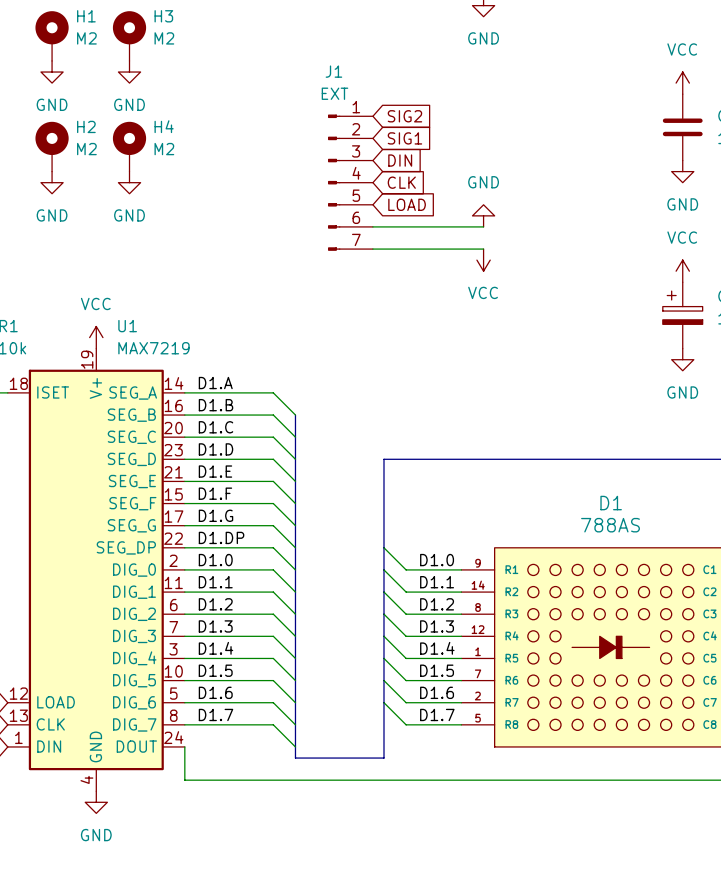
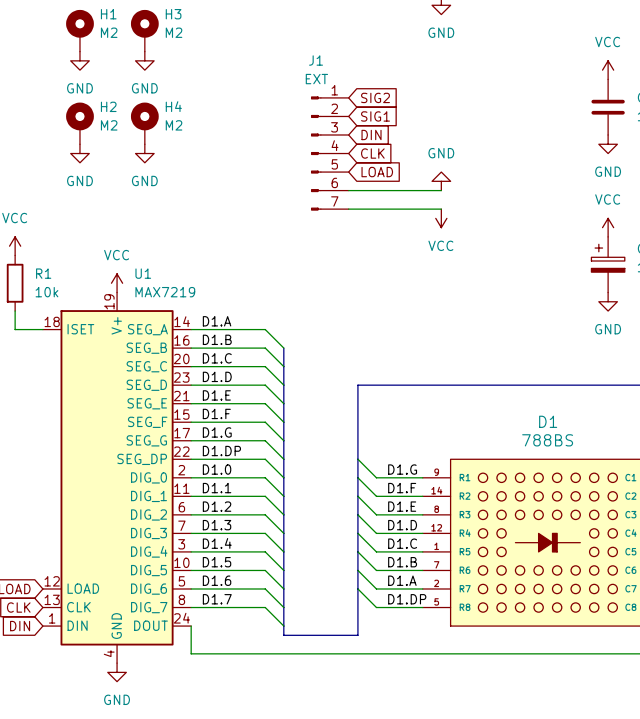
D1 value: 788AS (610, 525) -> 788BS (547, 440)
label: D1.0 (437, 560) -> D1.G (402, 469)
label: D1.1 (437, 582) -> D1.F (402, 488)
label: D1.2 (437, 604) -> D1.E (402, 506)
label: D1.3 (437, 626) -> D1.D (402, 525)
label: D1.4 (437, 648) -> D1.C (402, 543)
label: D1.5 (437, 670) -> D1.B (402, 562)
label: D1.6 (437, 692) -> D1.A (402, 580)
label: D1.7 (437, 714) -> D1.DP (407, 599)

